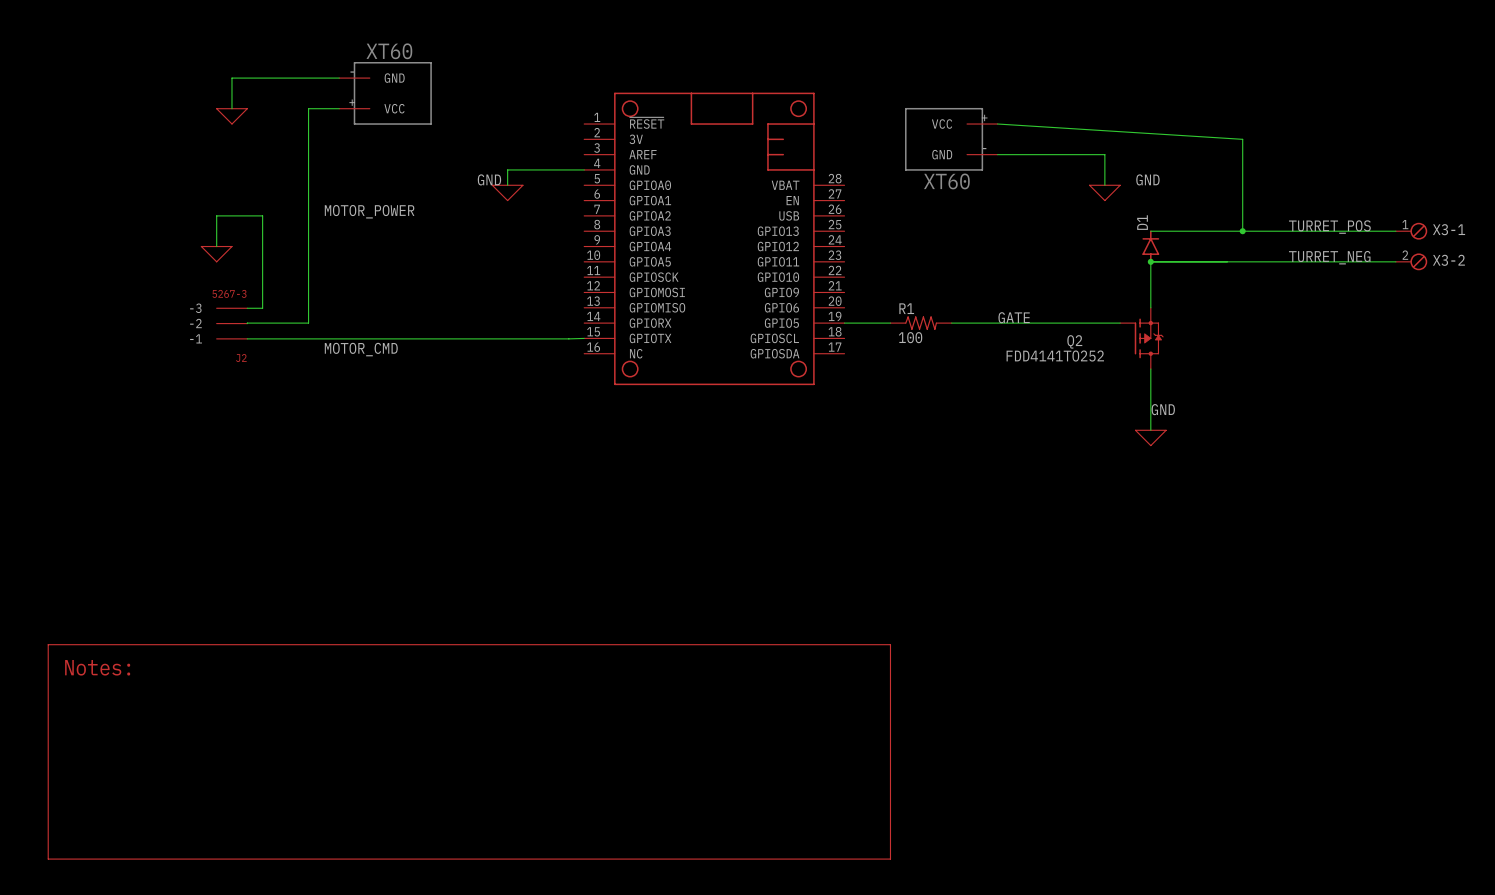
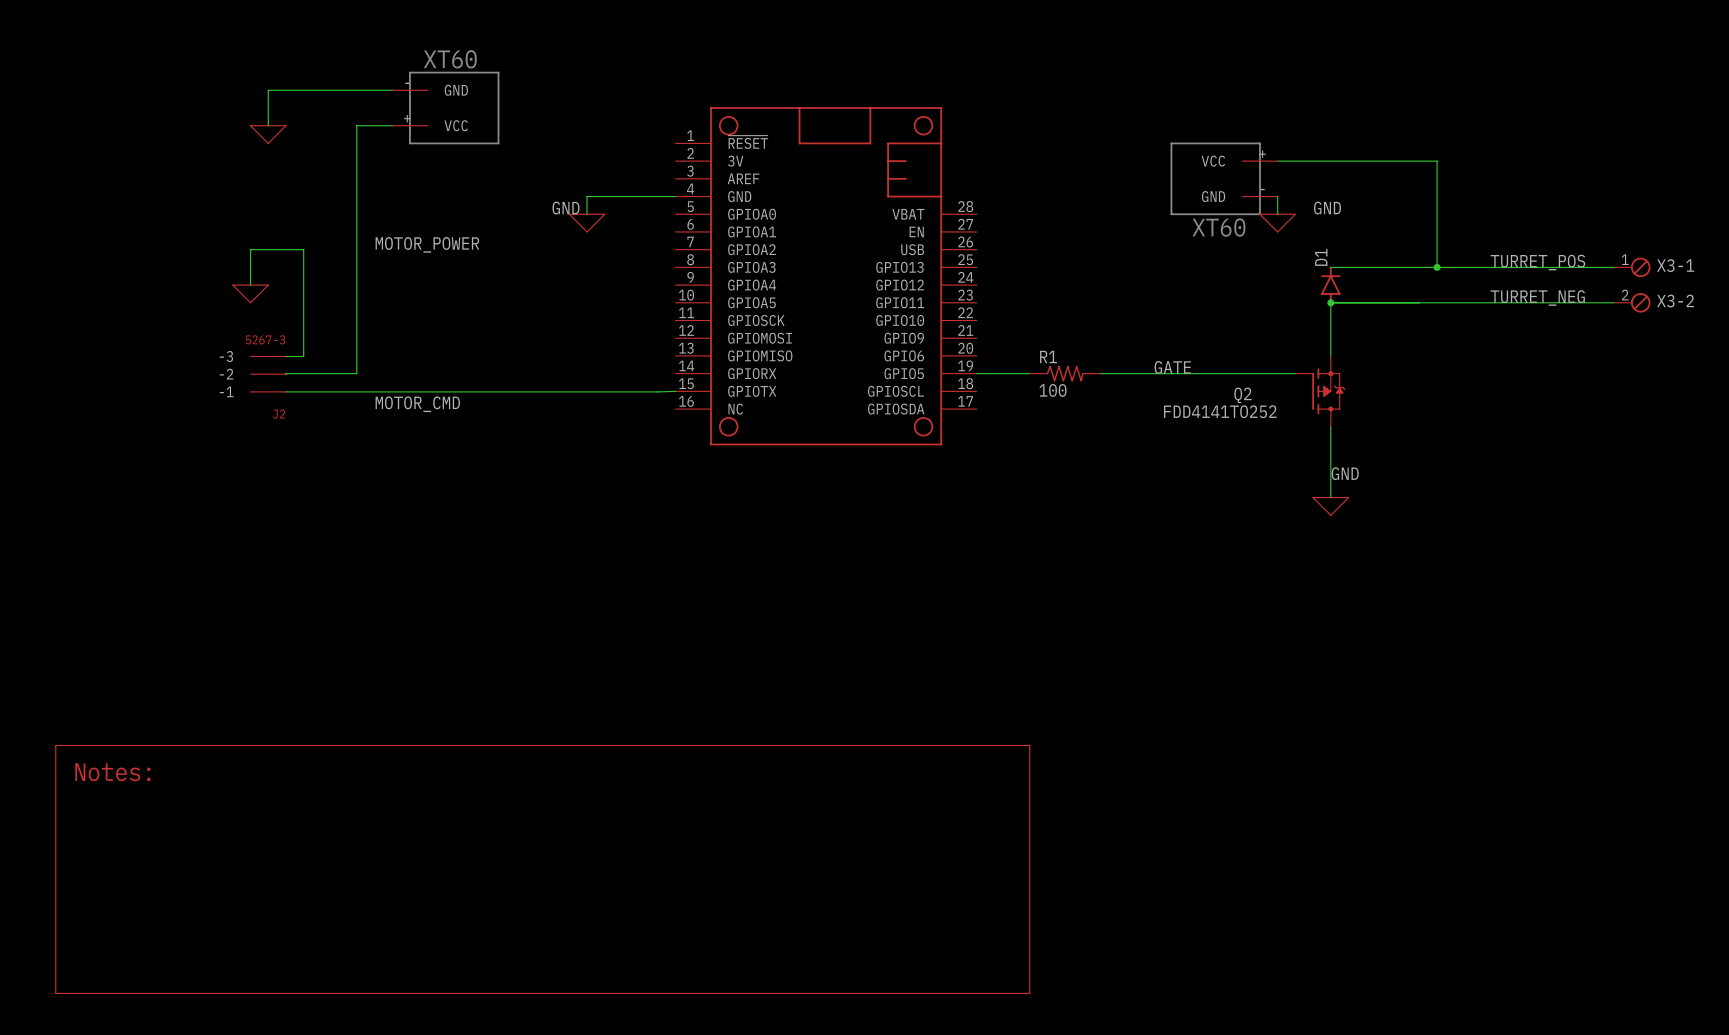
wire: (997, 124) (1242, 139) -> (1277, 161) (1437, 161)
part position: (951, 139) -> (1224, 178)
wire: (997, 154) (1104, 154) (1104, 169) -> none

